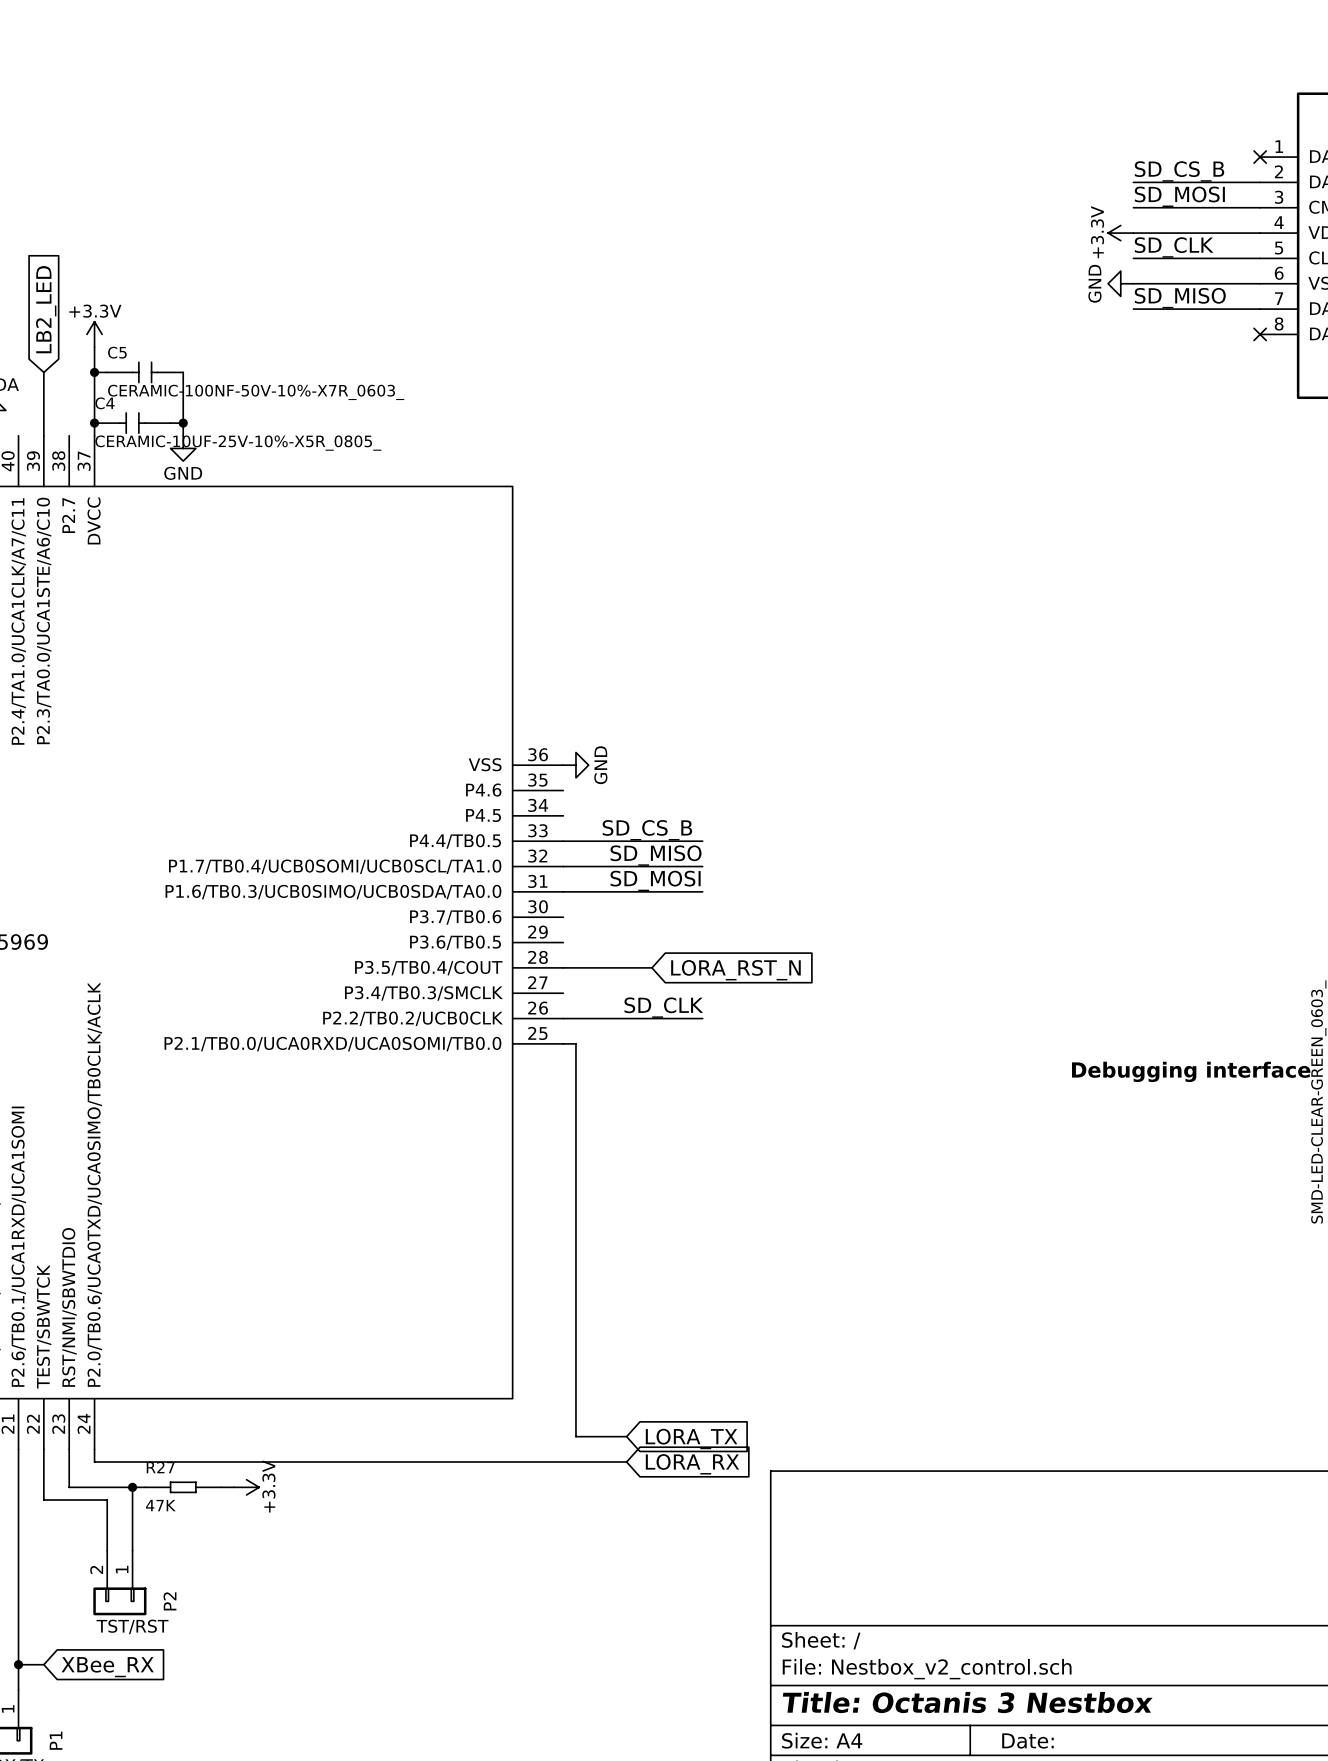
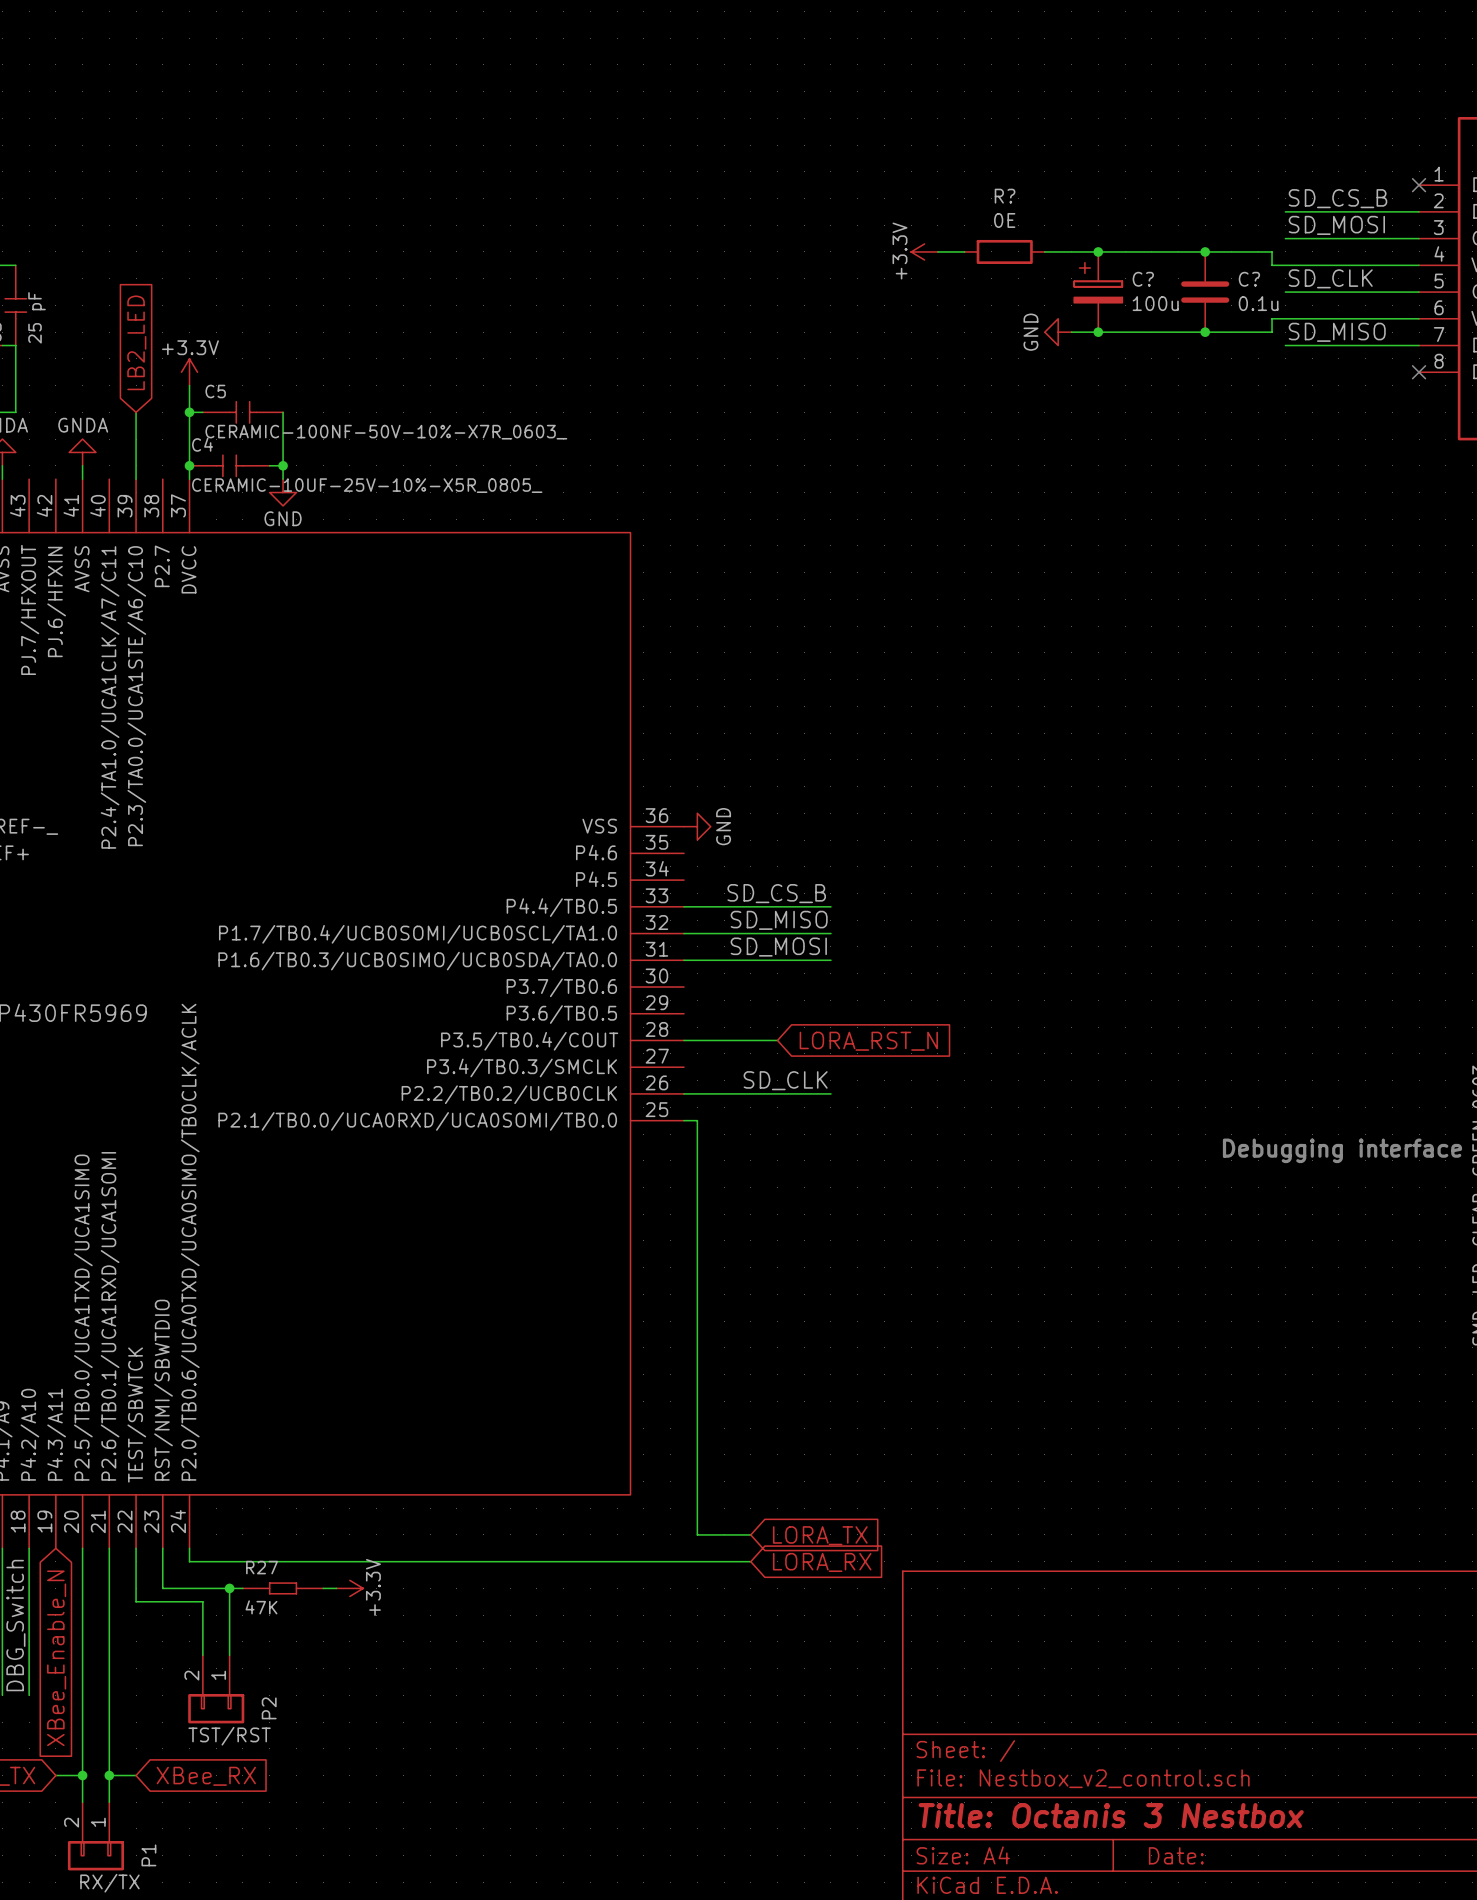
power symbol: none -> +3.3V (924, 251)
wire: none -> (937, 251) (964, 251)
R?: none -> 0E (1004, 251)
wire: none -> (1044, 251) (1272, 251) (1272, 265) (1285, 265)
junction: none -> (1098, 251)
junction: none -> (1205, 251)
power symbol: +3.3V (1120, 233) -> none
C?: none -> 100u (1098, 292)
C?: none -> 0.1u (1205, 292)
power symbol position: GND (1120, 283) -> GND (1058, 332)
wire: none -> (1285, 318) (1272, 318) (1272, 332) (1071, 332)
junction: none -> (1098, 332)
junction: none -> (1205, 332)

